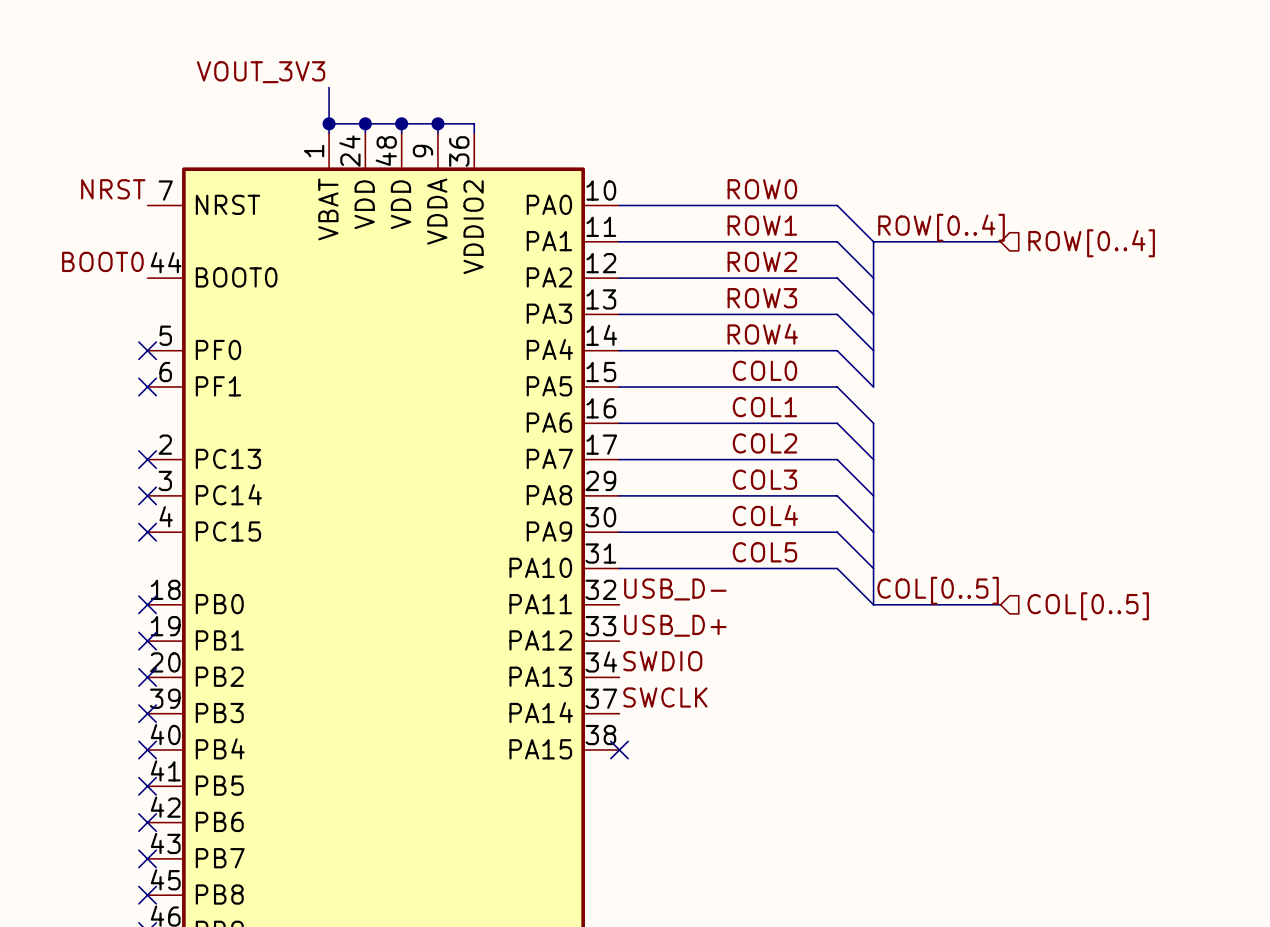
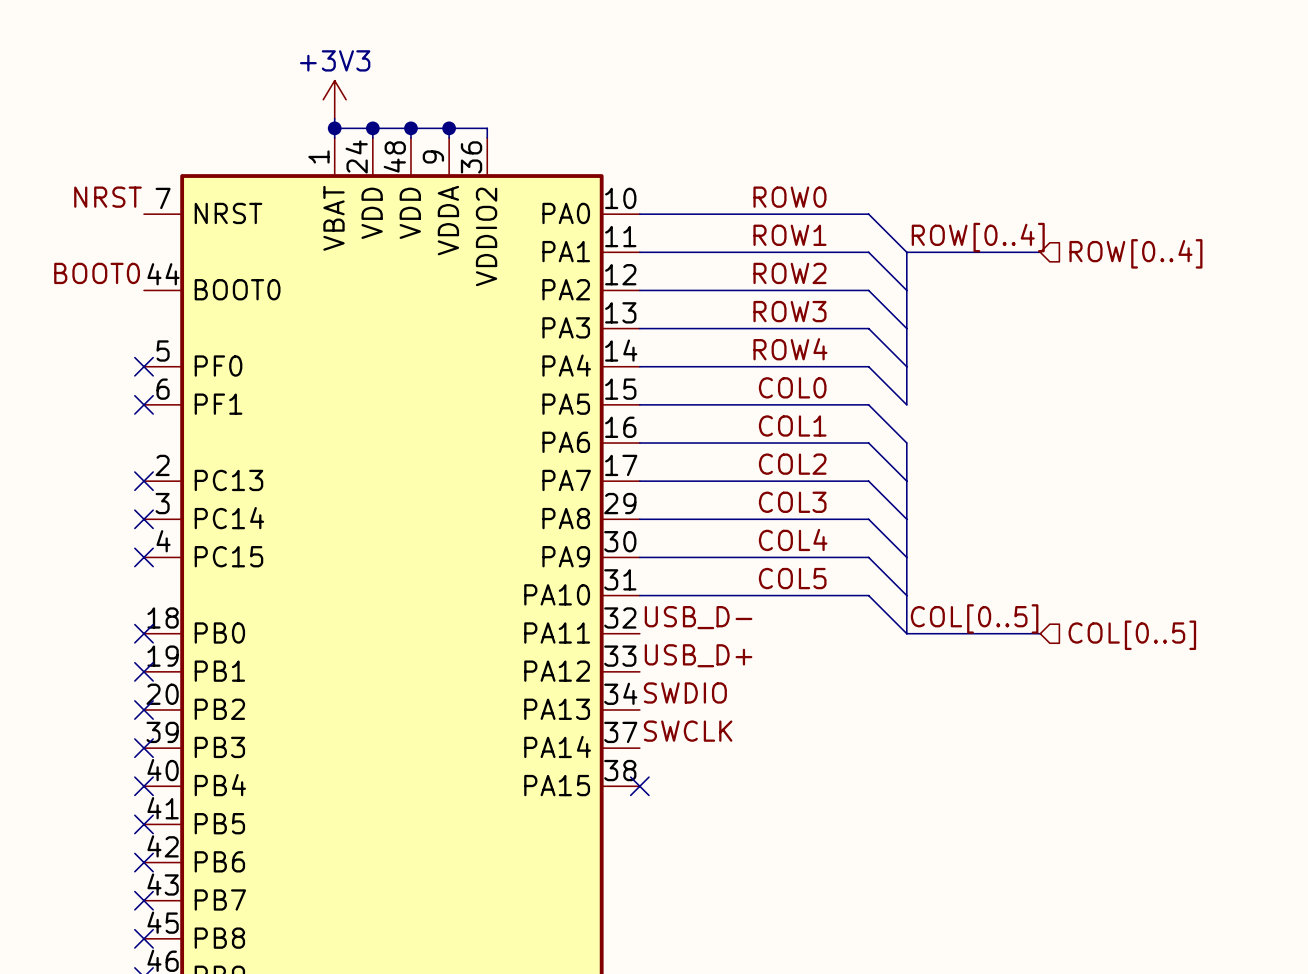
label: VOUT_3V3 (261, 72) -> none
power symbol: none -> +3V3 (334, 99)

